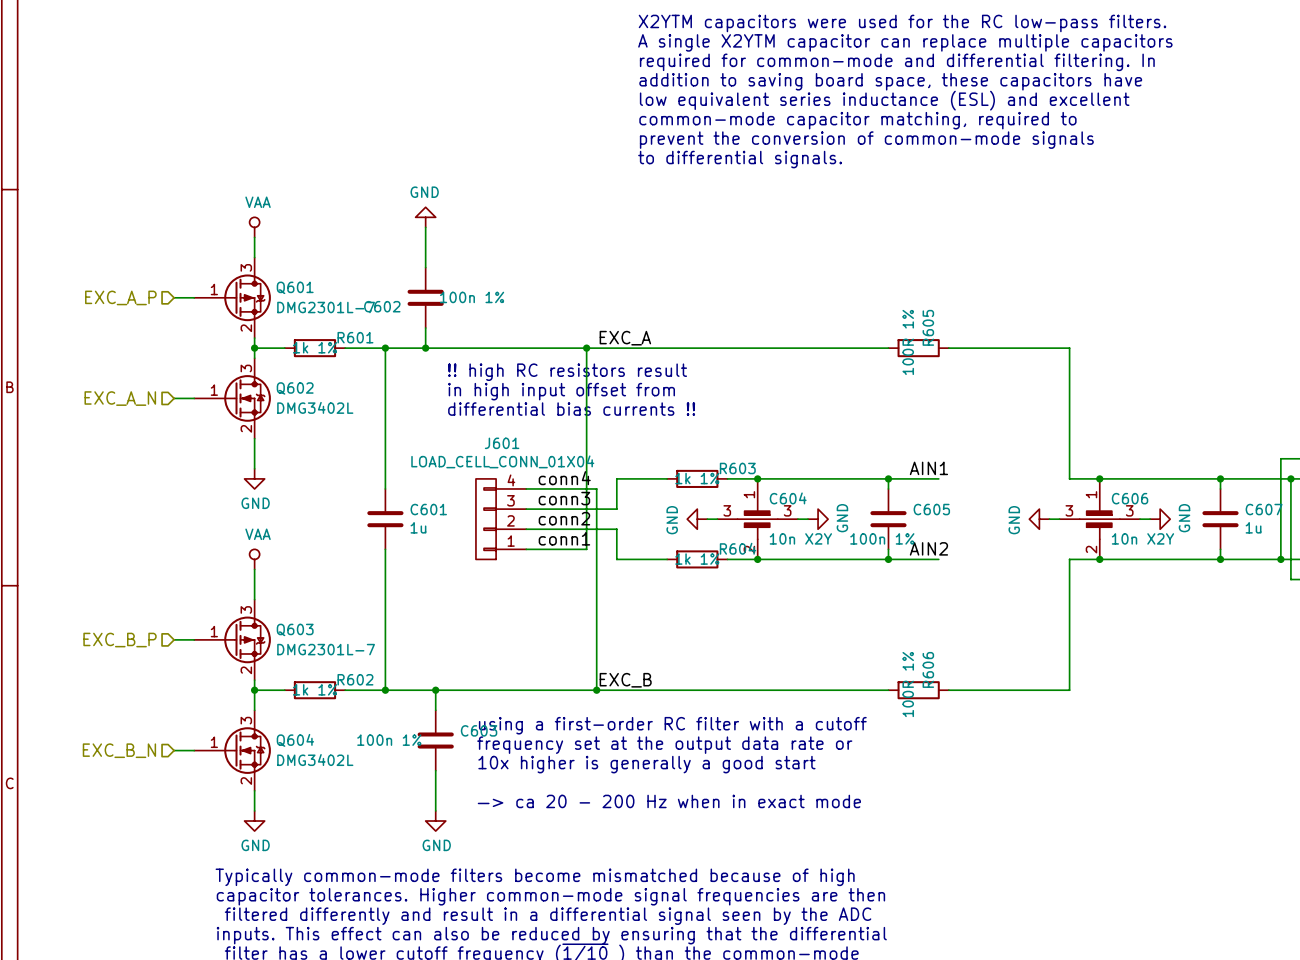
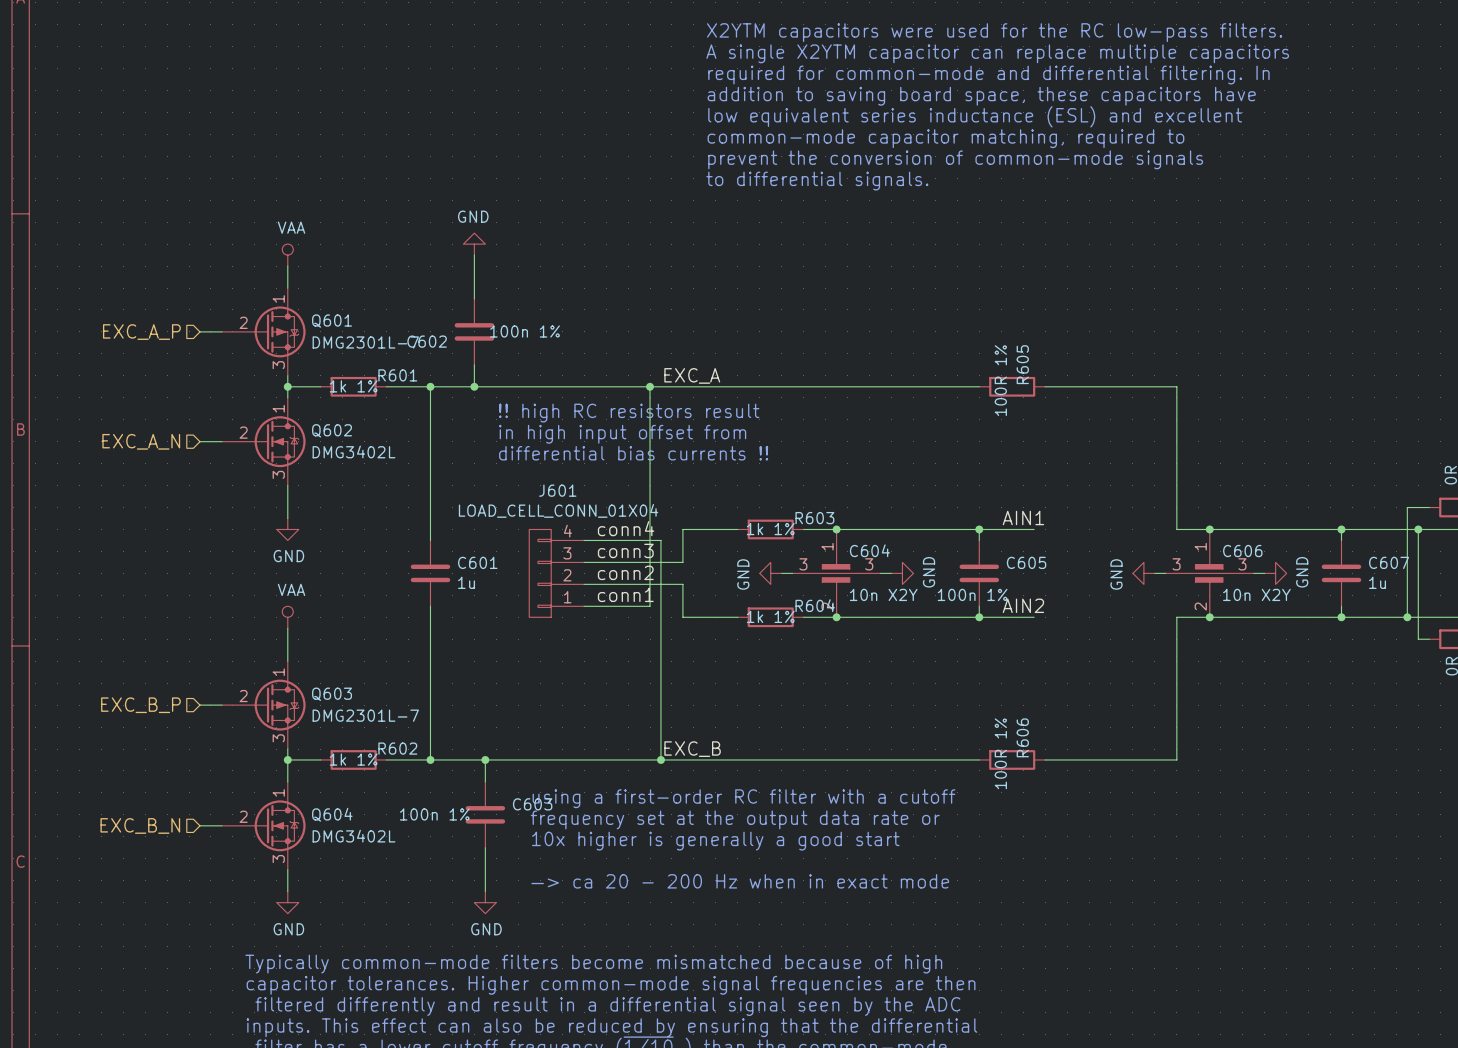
Q601 pin number: 3 (246, 267) -> 1 (278, 298)
Q601 pin number: 1 (214, 289) -> 2 (243, 322)
Q601 pin number: 2 (246, 328) -> 3 (278, 365)
Q602 pin number: 3 (246, 368) -> 1 (278, 408)
Q602 pin number: 1 (214, 390) -> 2 (243, 432)
Q602 pin number: 2 (246, 428) -> 3 (278, 474)
Q603 pin number: 3 (246, 609) -> 1 (278, 672)
Q603 pin number: 1 (214, 631) -> 2 (243, 696)
Q603 pin number: 2 (246, 670) -> 3 (278, 738)
Q604 pin number: 3 (246, 720) -> 1 (278, 792)
Q604 pin number: 1 (214, 742) -> 2 (243, 816)
Q604 pin number: 2 (246, 781) -> 3 (278, 859)

